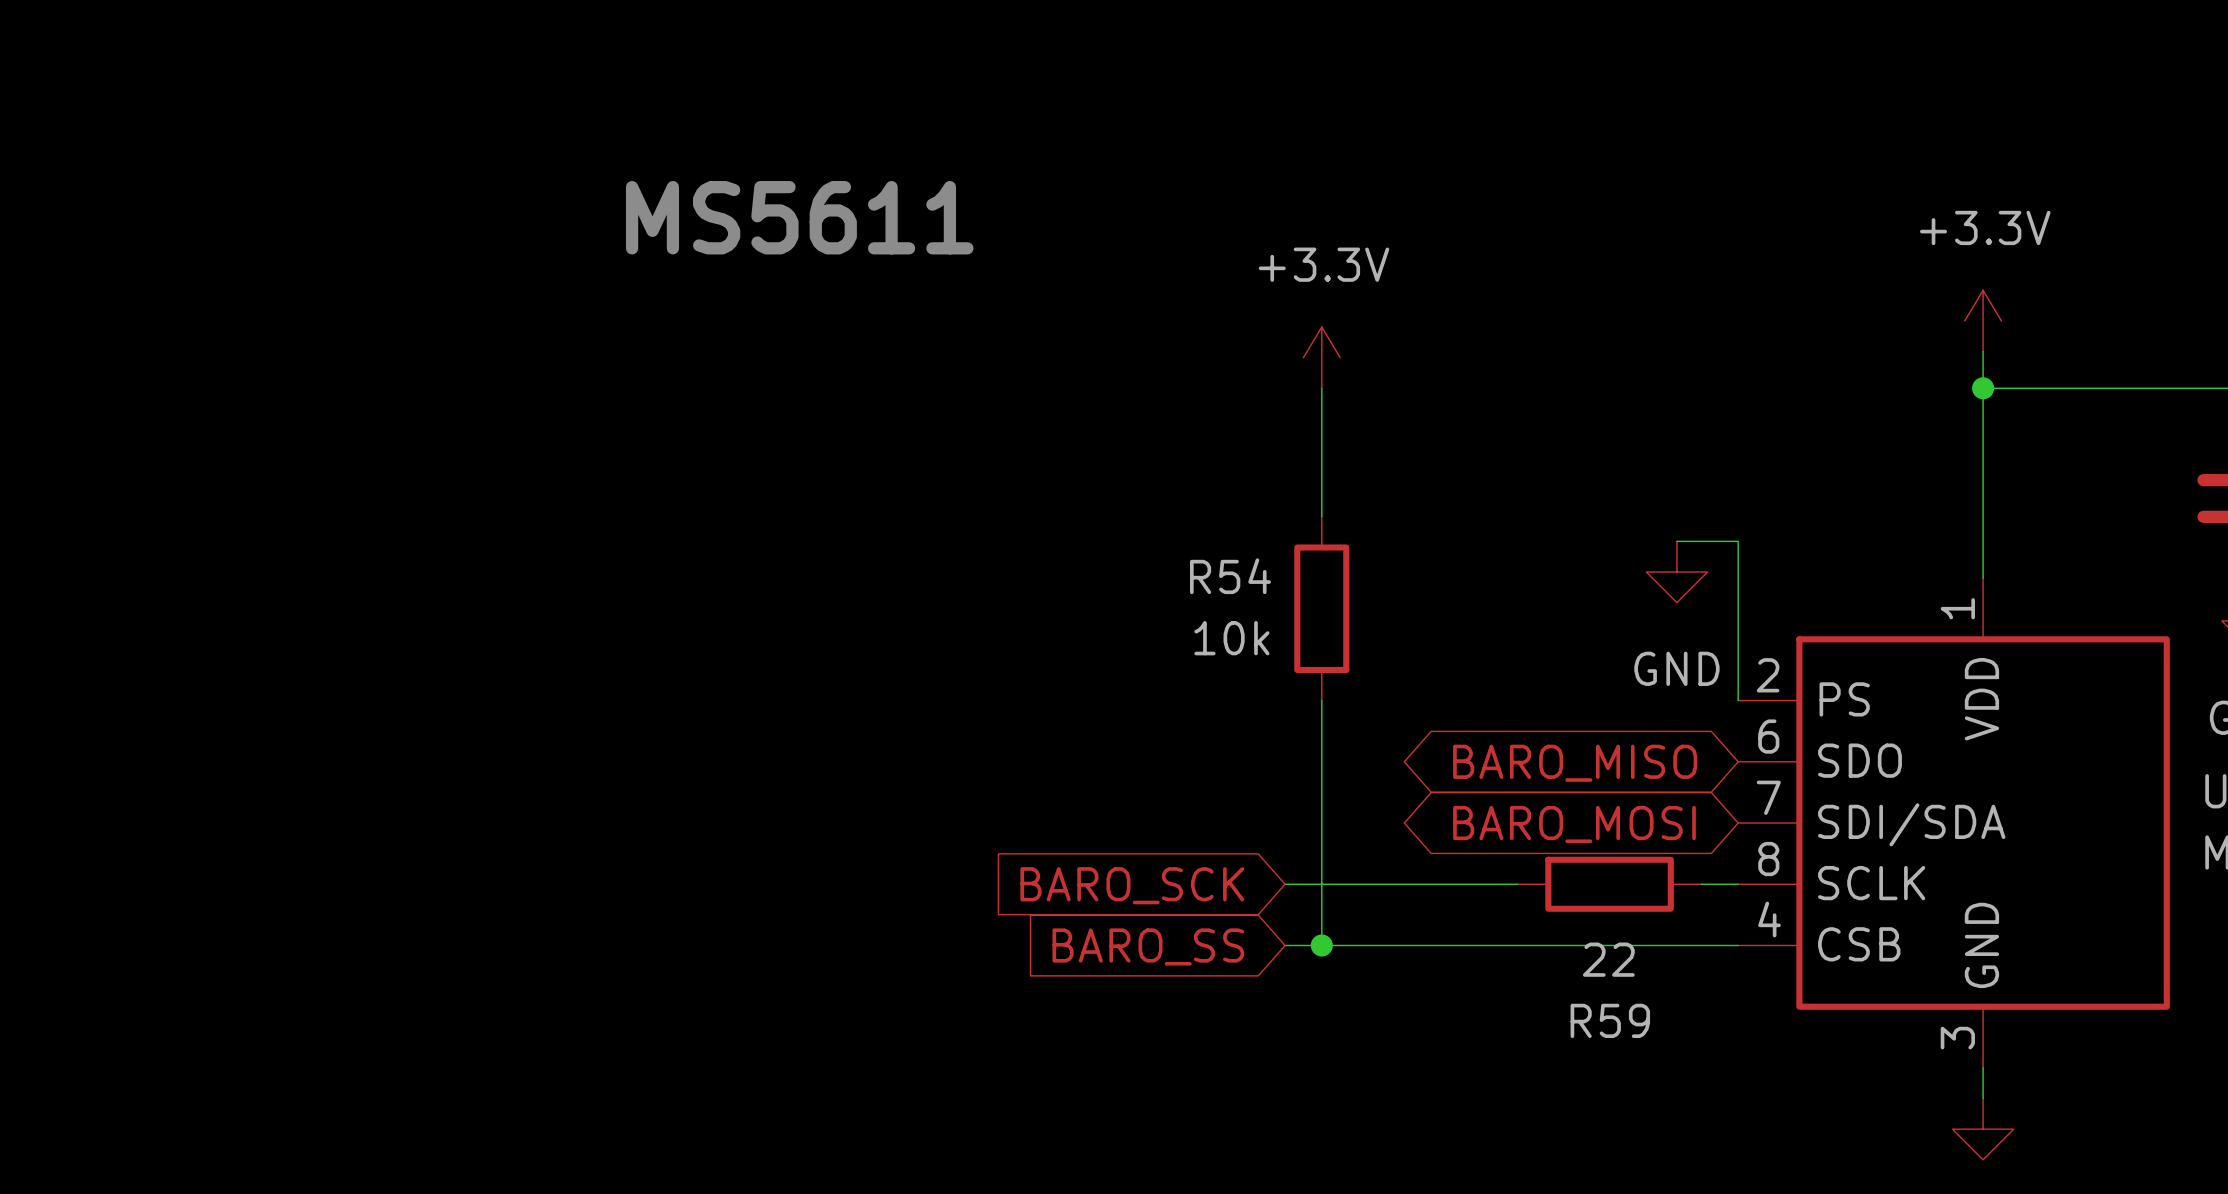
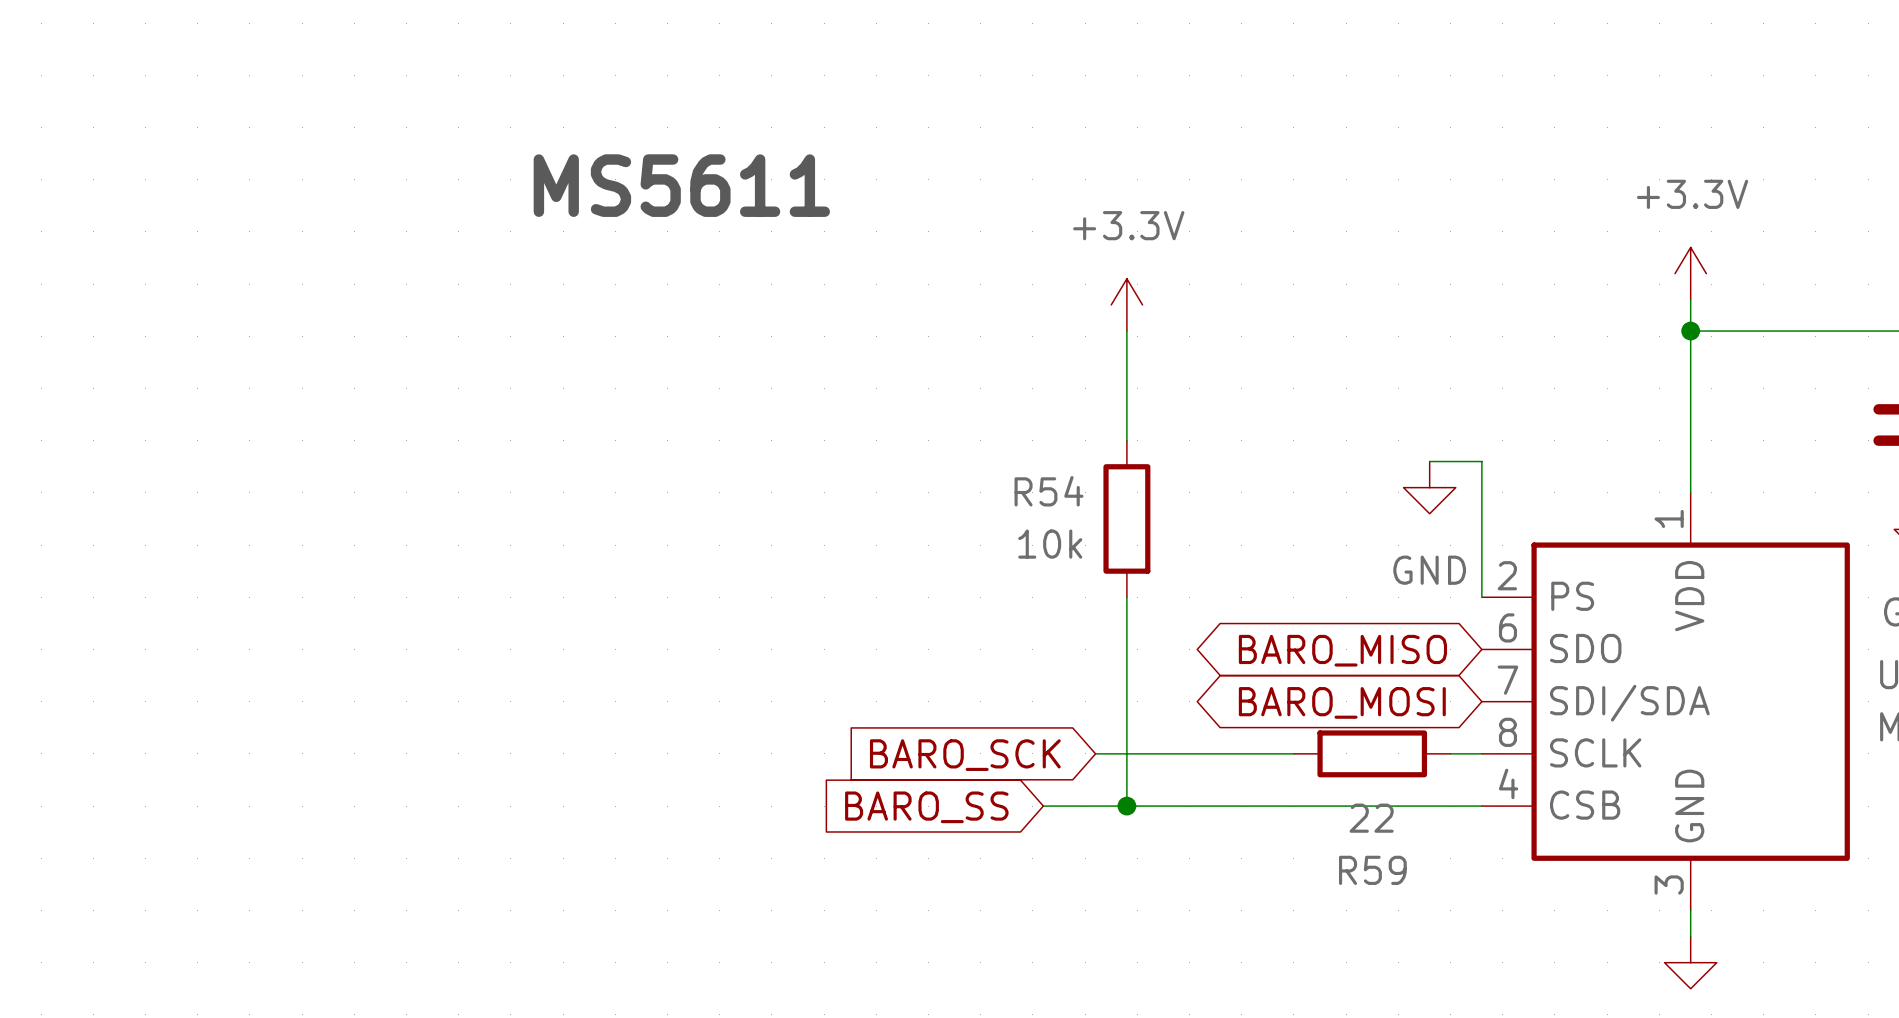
wire: none -> (1043, 806) (1095, 806)
global label position: BARO_SS (1148, 946) -> BARO_SS (926, 807)

